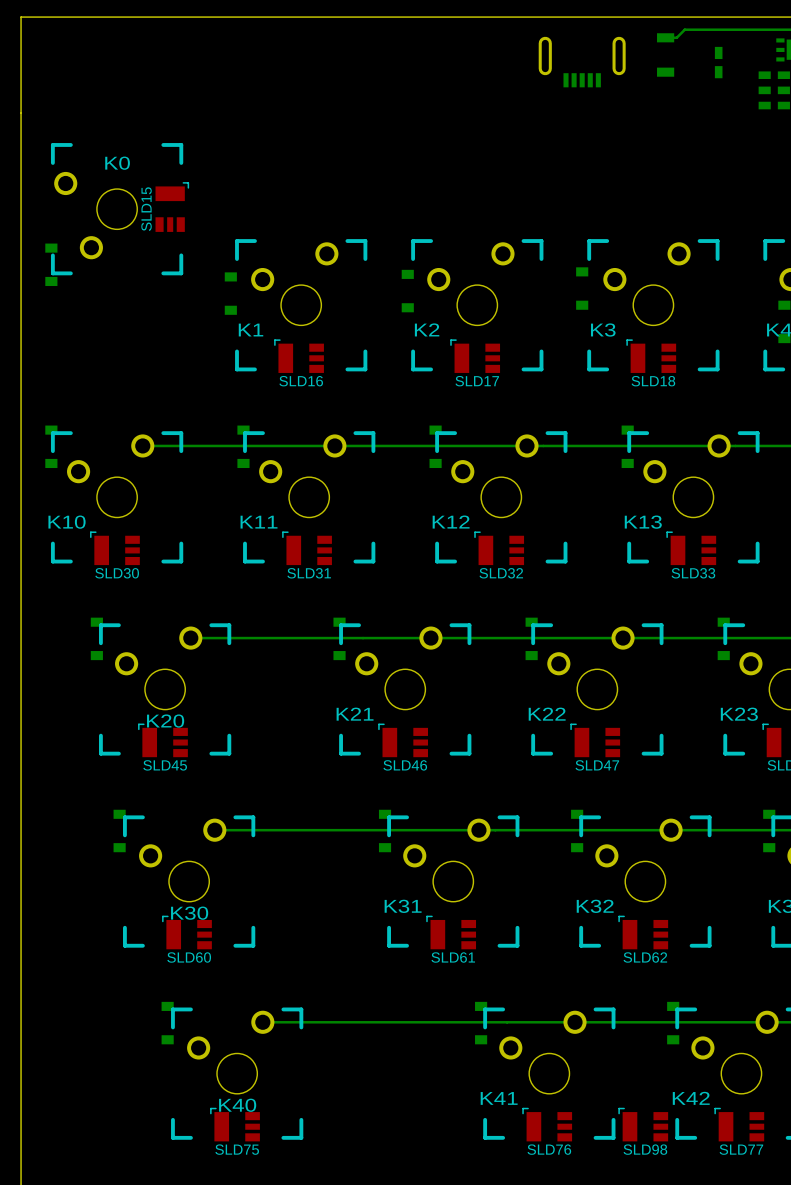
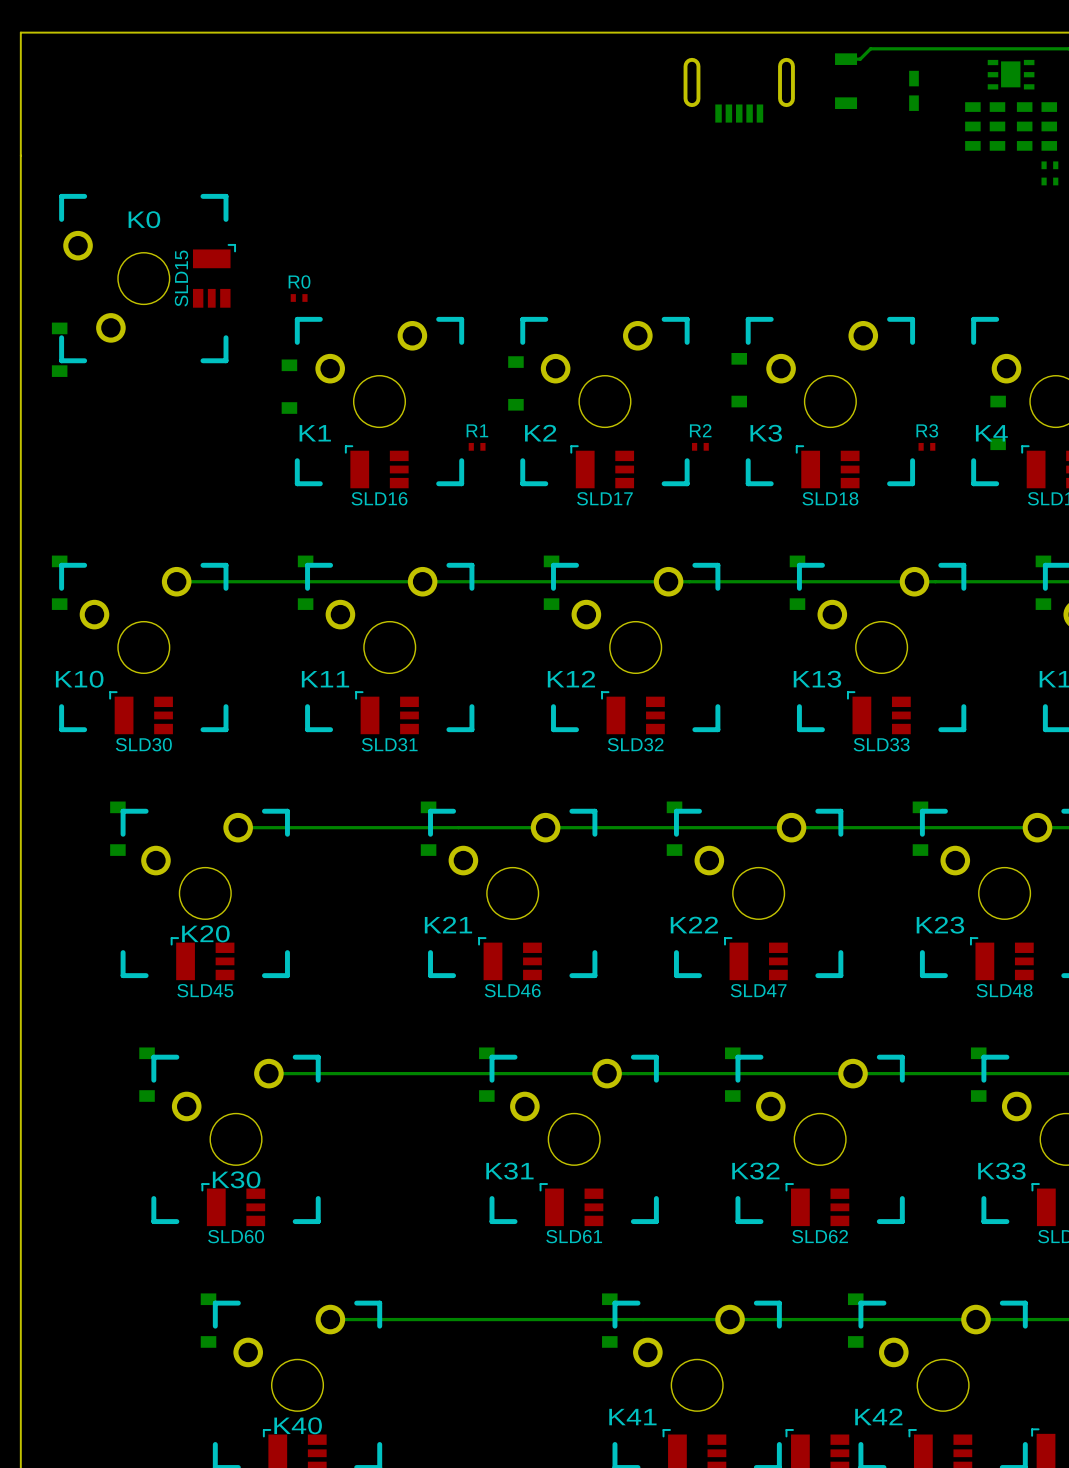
R0: none -> (299, 297)
R1: none -> (477, 446)
R2: none -> (700, 446)
R3: none -> (926, 446)

